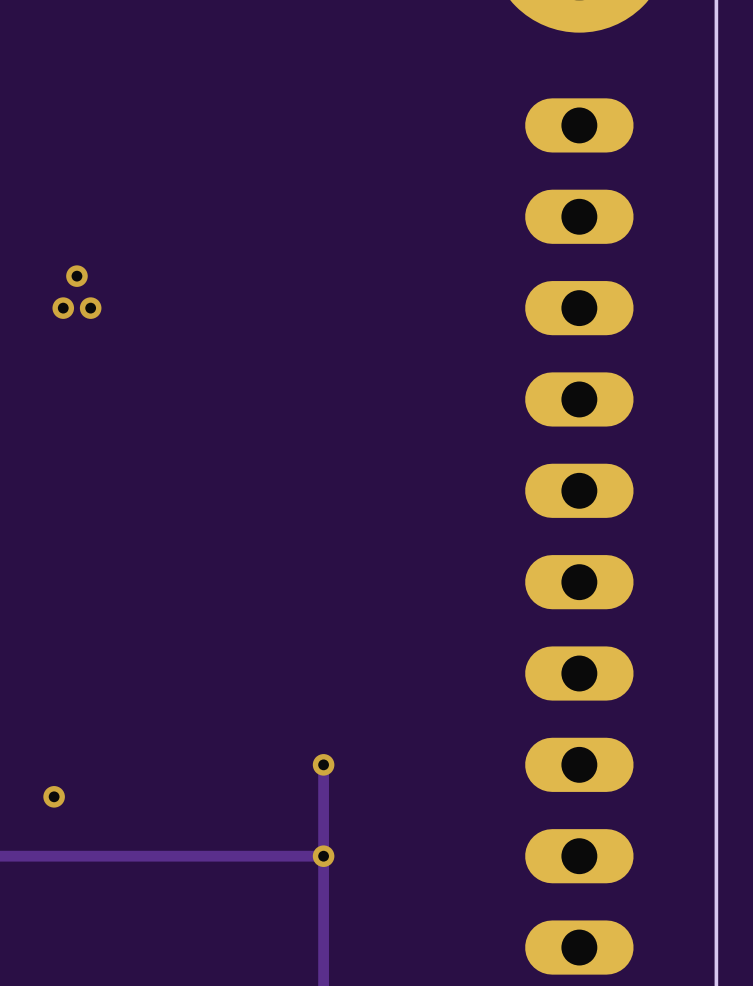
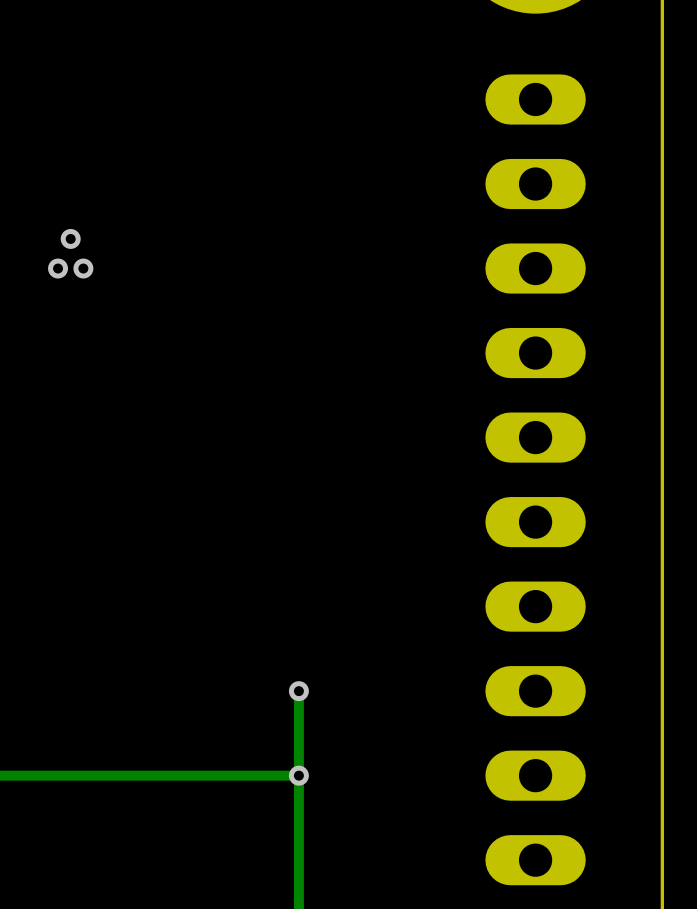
via: (54, 796) -> none

